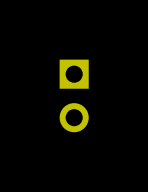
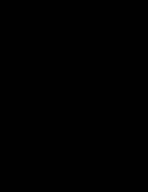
part: (74, 95) -> none

